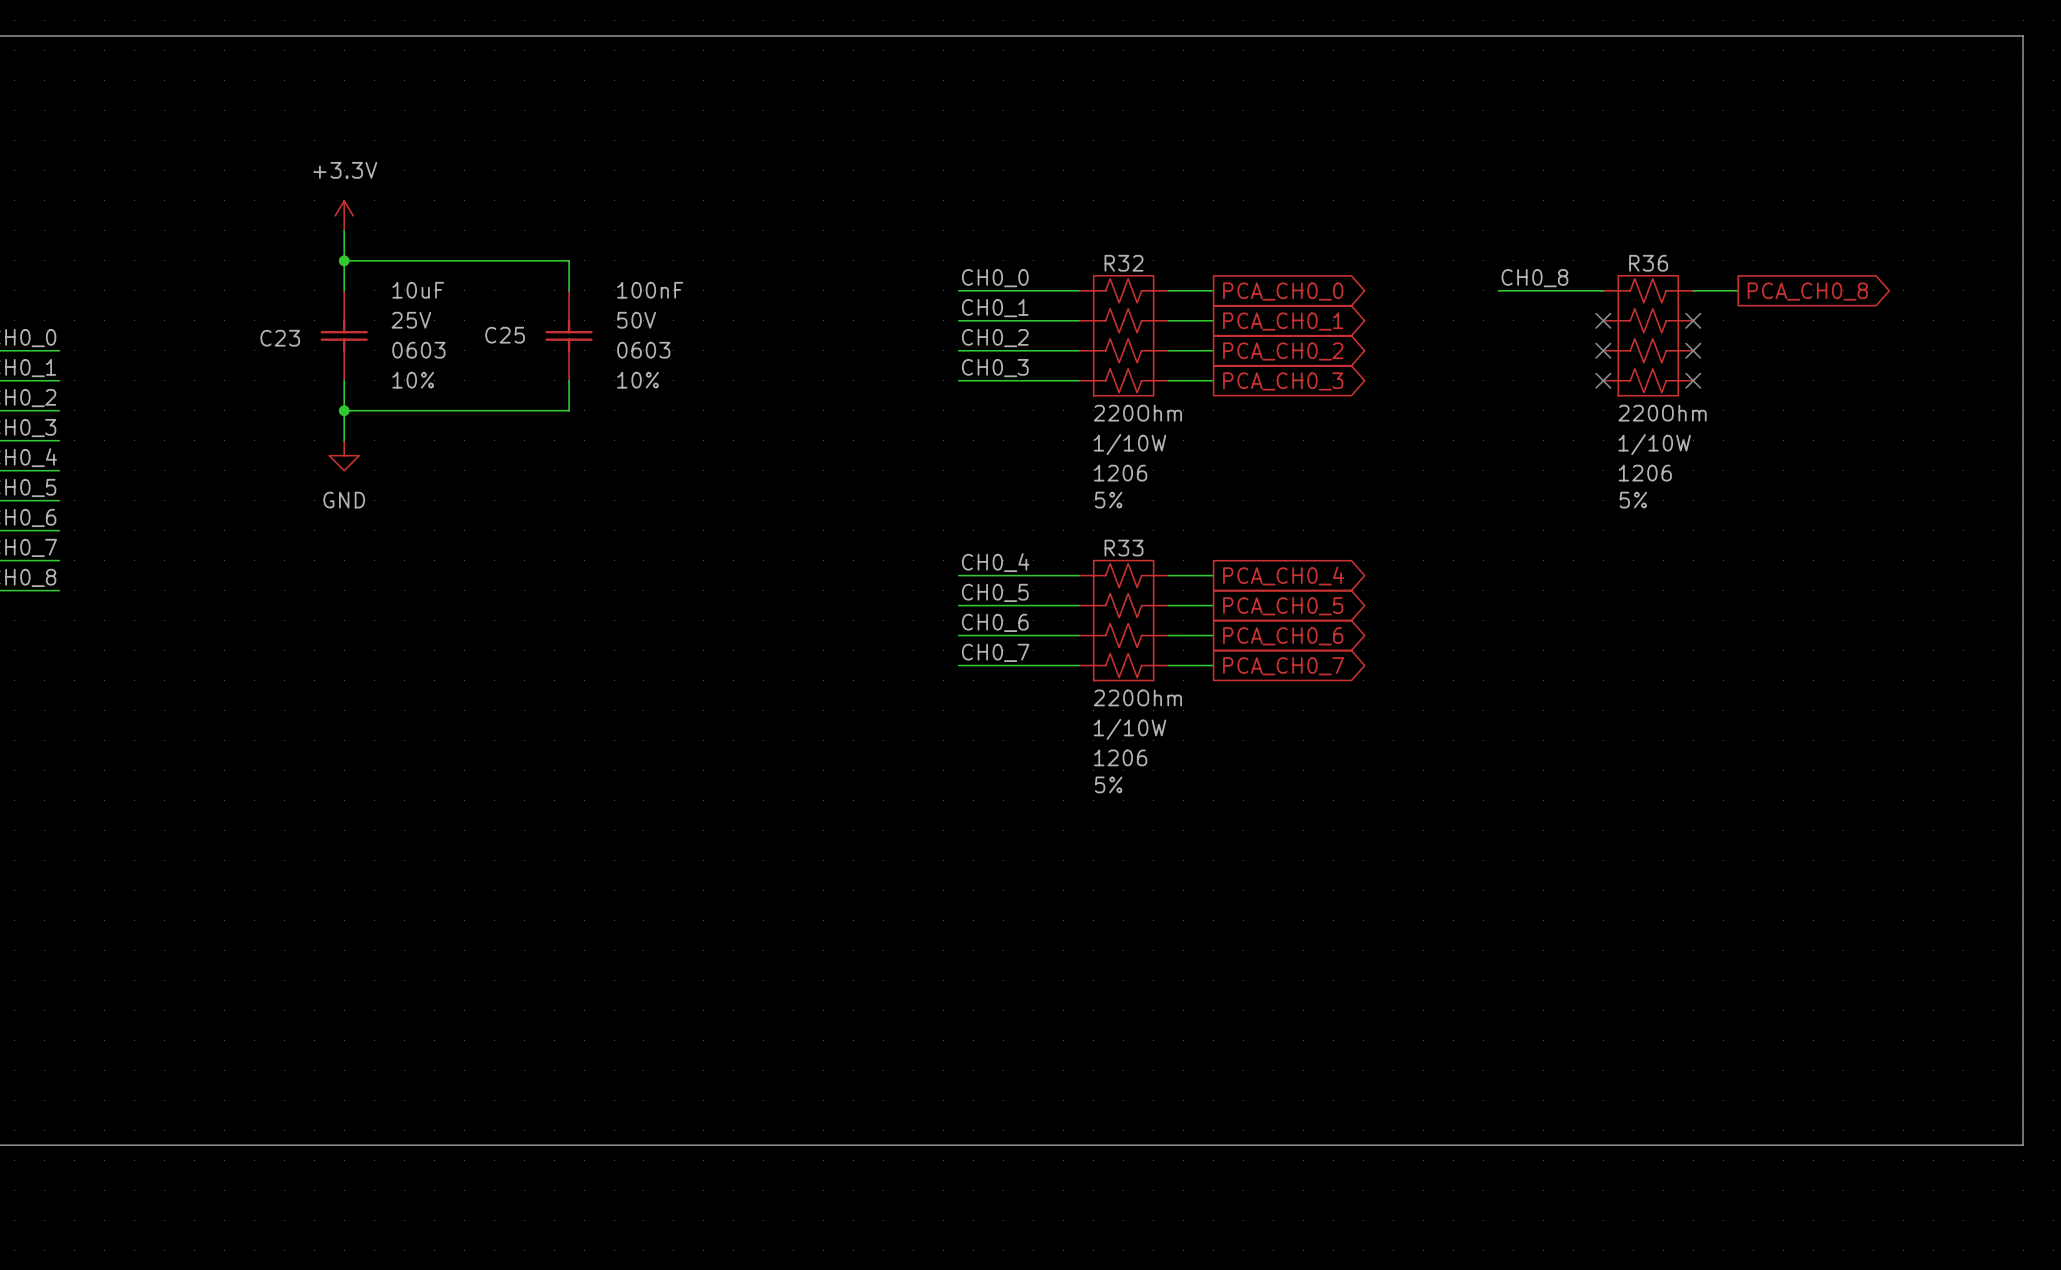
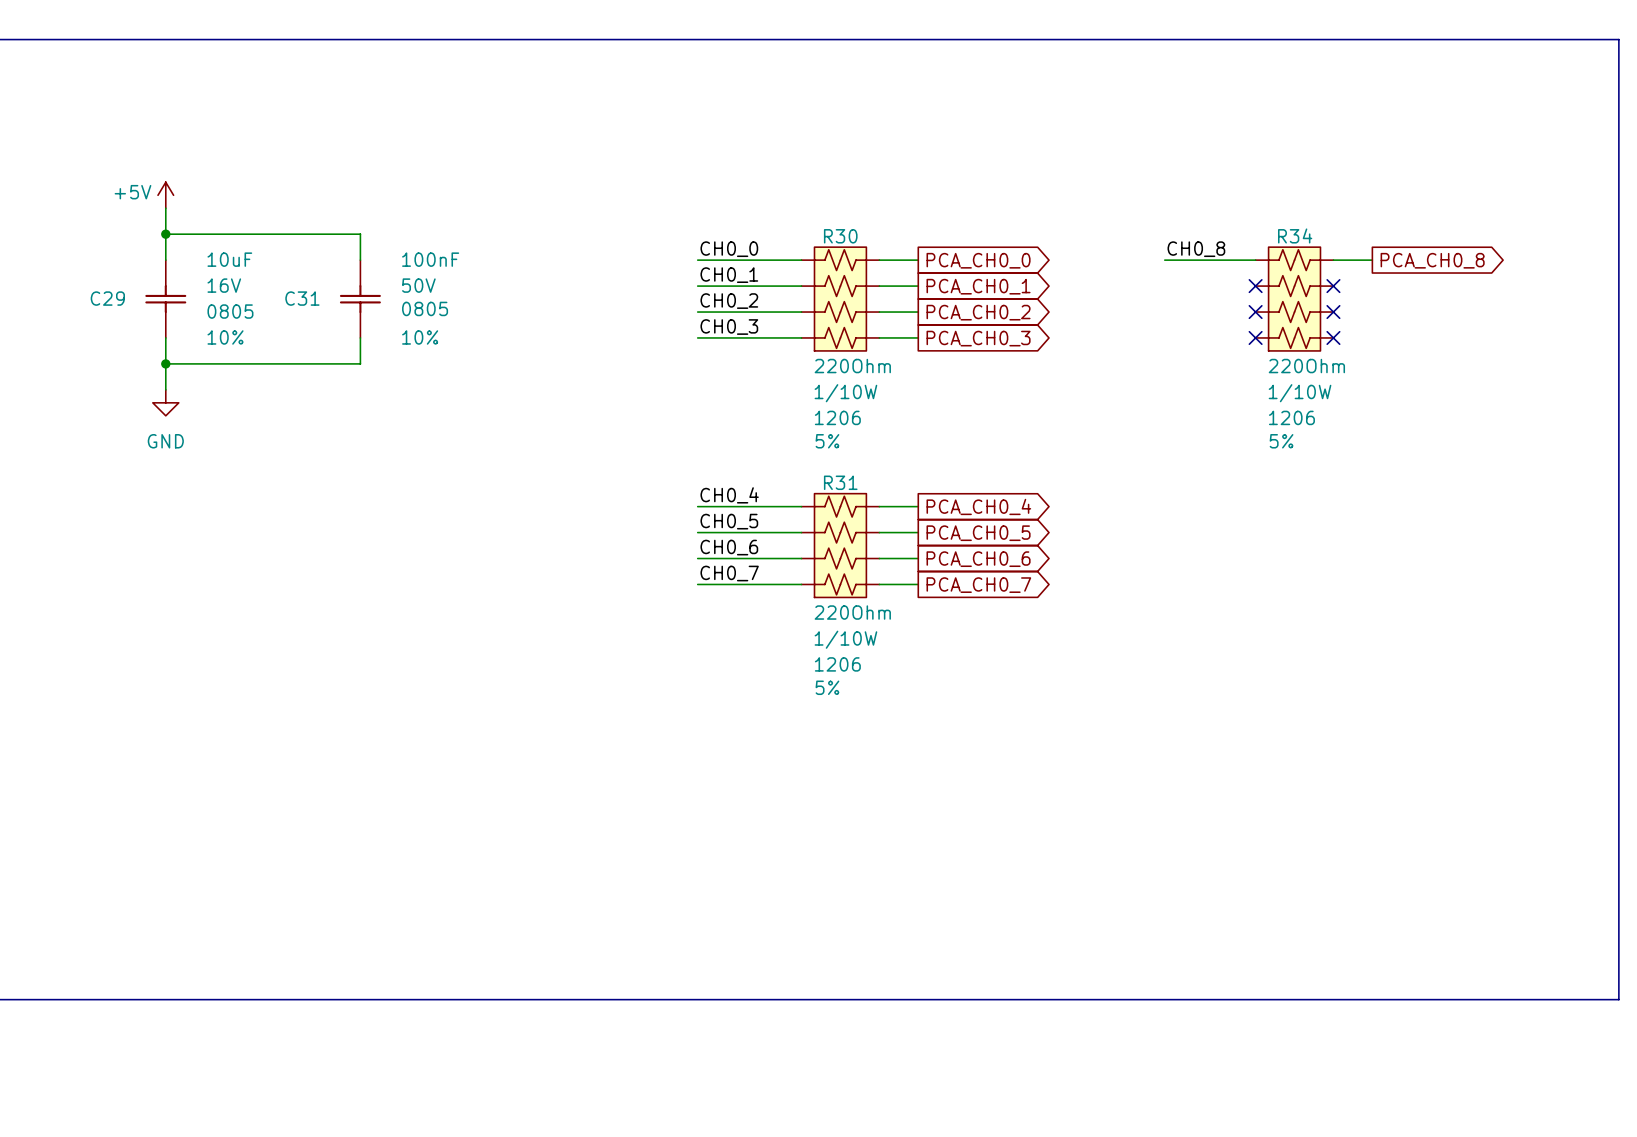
power symbol: +3.3V (344, 215) -> +5V (165, 195)
R32 name: R32 (1124, 263) -> R30 (840, 236)
R36 name: R36 (1648, 263) -> R34 (1295, 235)
C23 text: 25V (411, 320) -> 16V (224, 285)
C25 name: C25 (505, 335) -> C31 (302, 298)
C23 name: C23 (280, 338) -> C29 (107, 298)
C23 text: 0603 (418, 350) -> 0805 (230, 311)
C25 text: 0603 (643, 350) -> 0805 (425, 308)
R33 name: R33 (1124, 548) -> R31 (840, 482)

